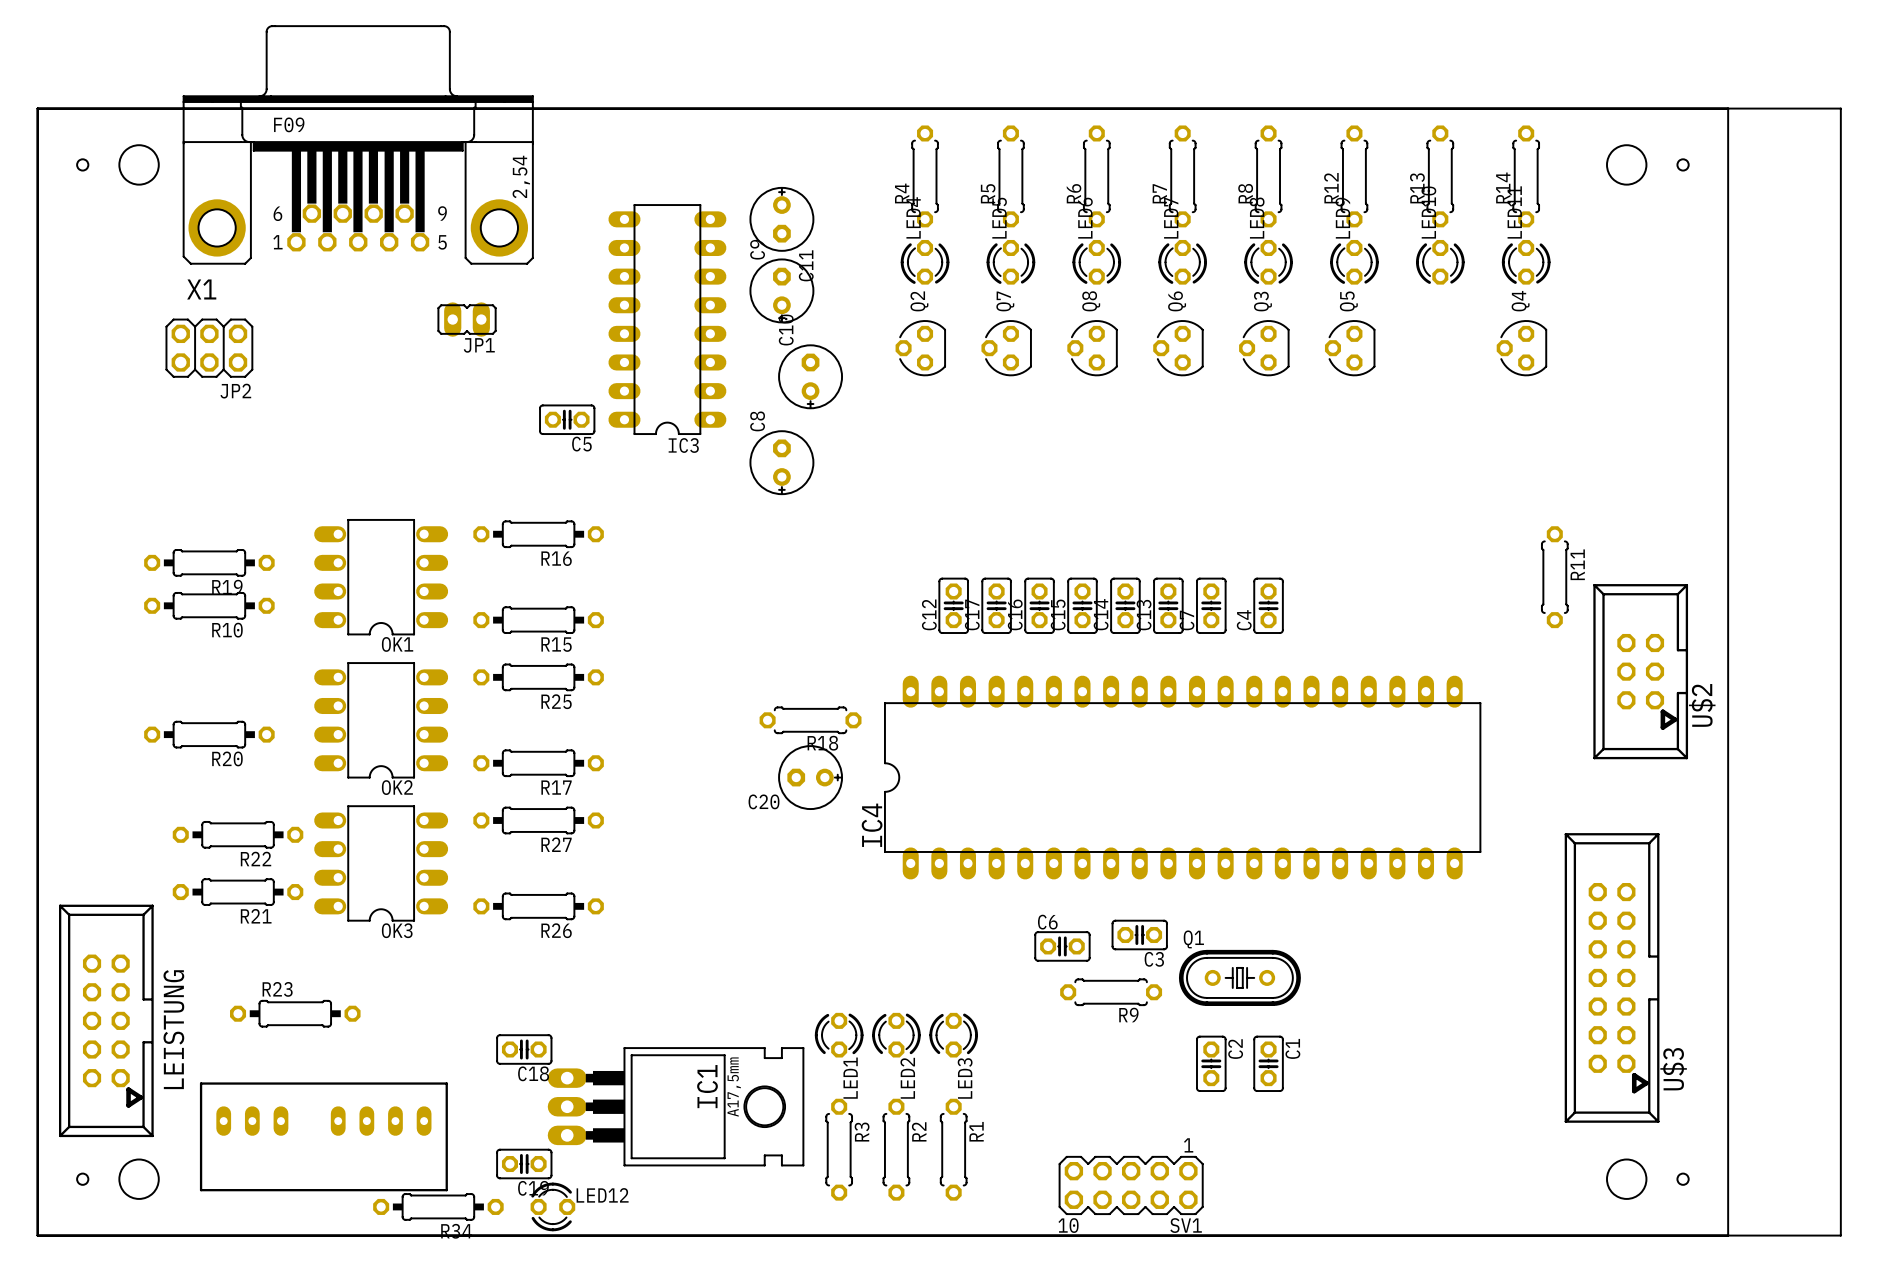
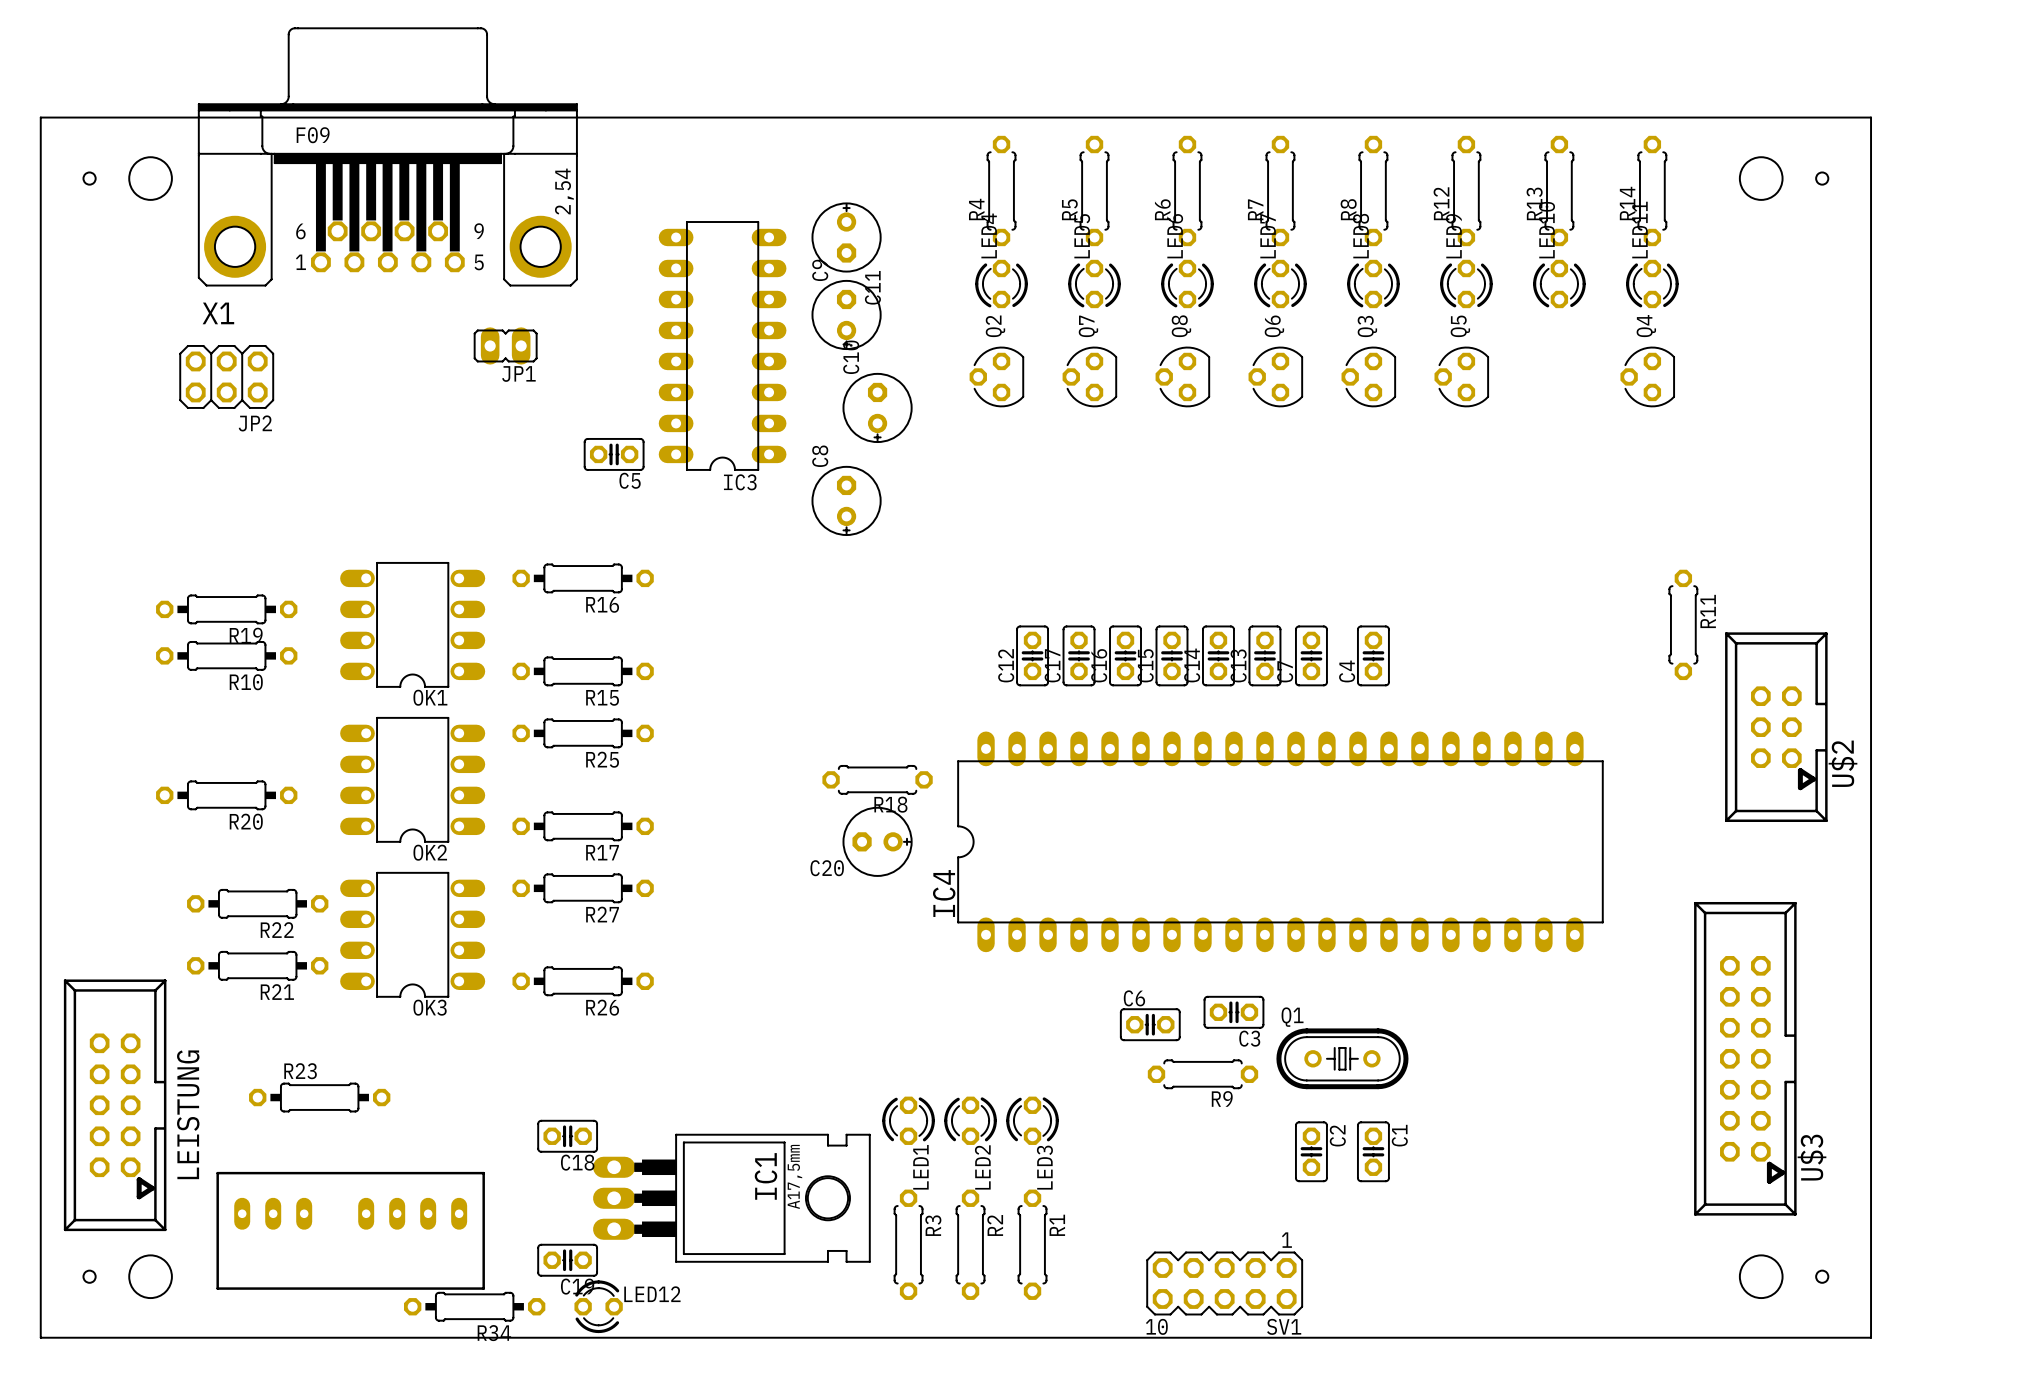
board edge: (37, 108) (1840, 108) (1840, 1235) (37, 1235) (37, 108) -> none

